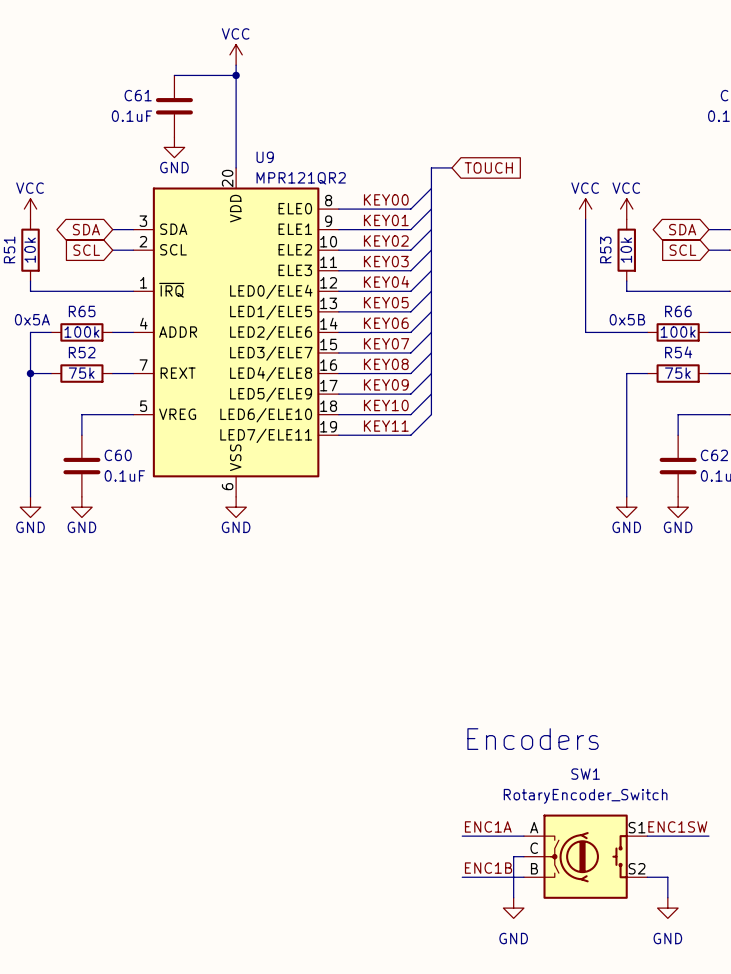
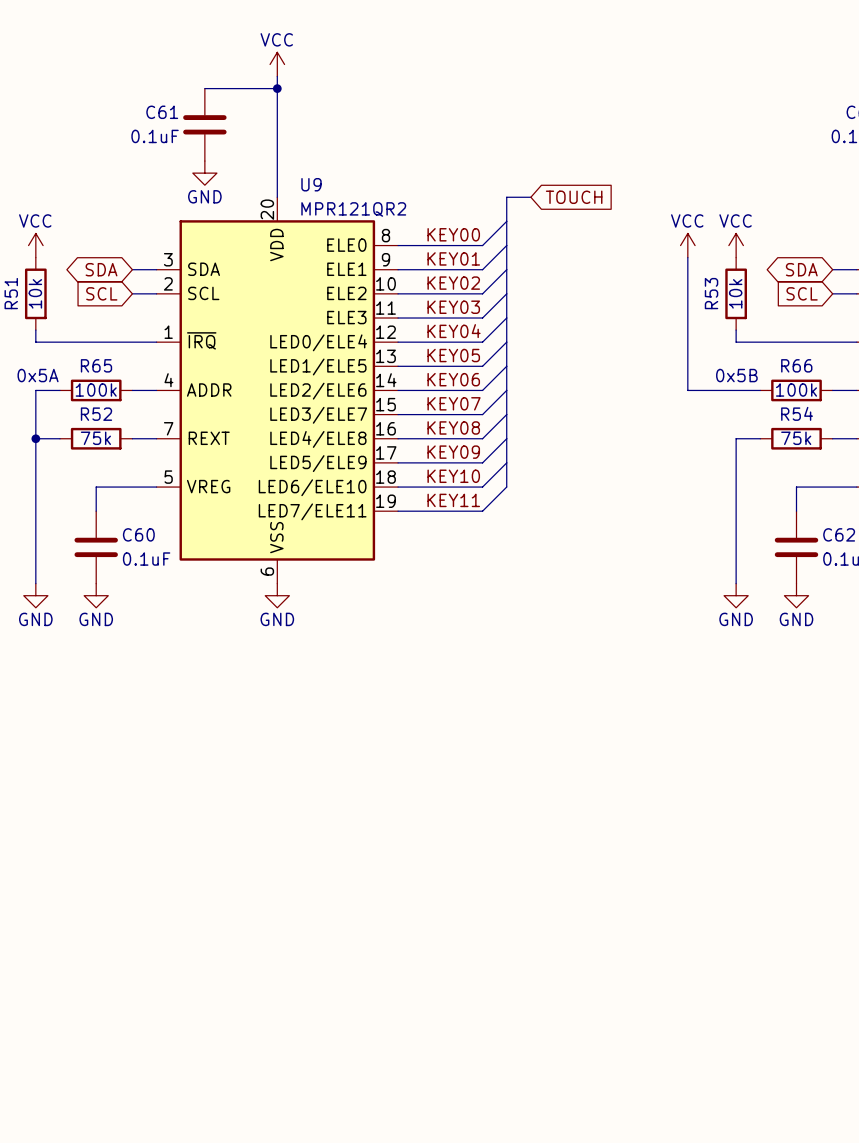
text: Encoders (533, 739) -> none
label: ENC1A (488, 826) -> none
label: ENC1SW (677, 826) -> none
wire: (462, 836) (523, 836) -> none
wire: (647, 836) (708, 836) -> none
wire: (523, 856) (513, 856) (513, 897) -> none
SW1: RotaryEncoder_Switch (585, 856) -> none
label: ENC1B (488, 868) -> none
wire: (462, 877) (523, 877) -> none
wire: (647, 877) (667, 877) (667, 897) -> none
power symbol: GND (513, 908) -> none
power symbol: GND (667, 908) -> none

